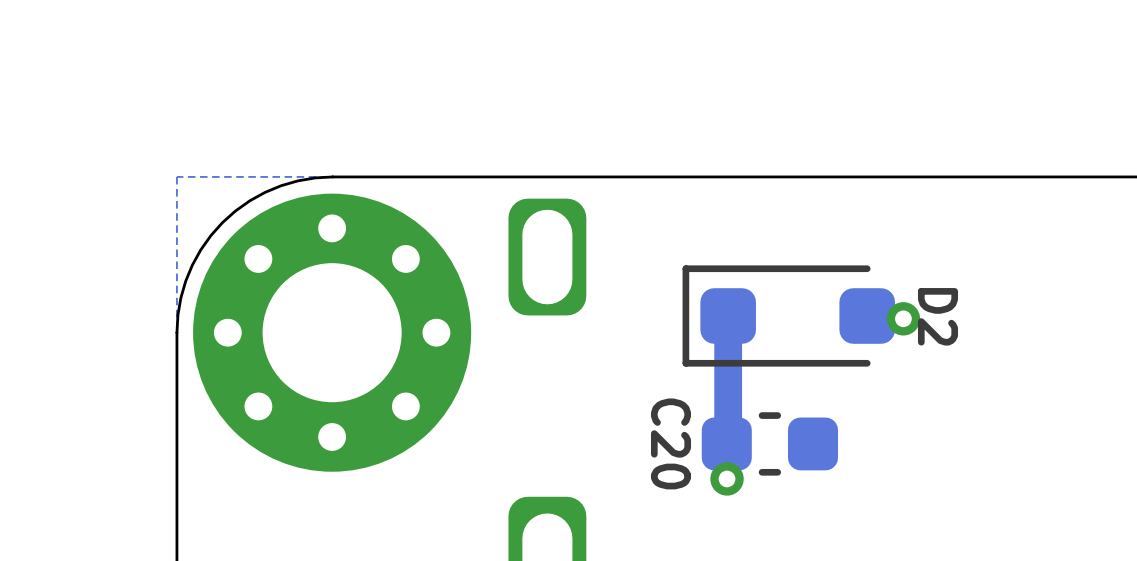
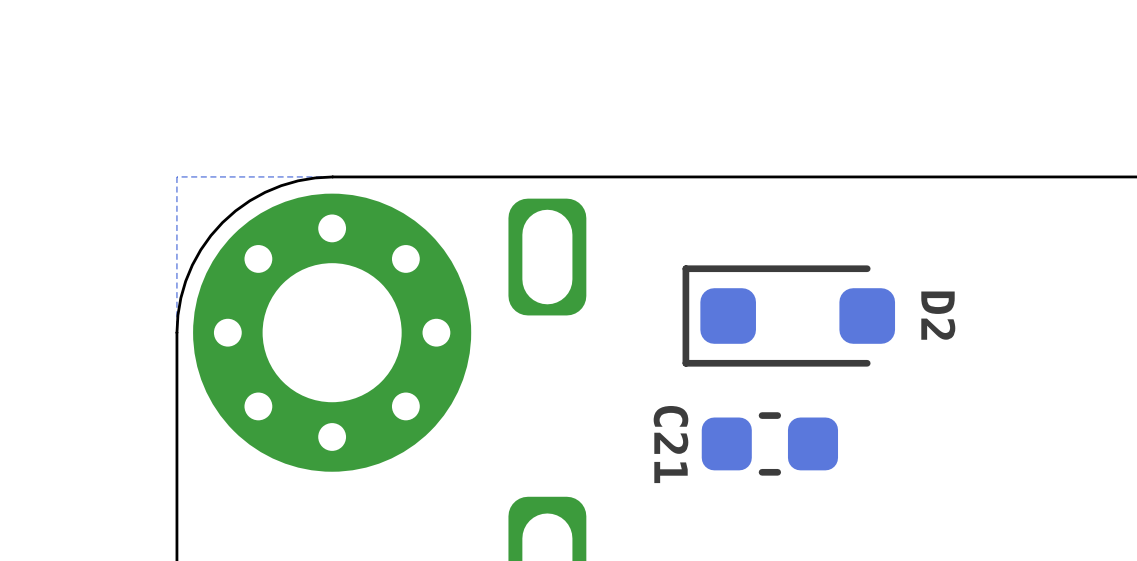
track: (728, 316) (728, 442) -> none
via: (903, 318) -> none
C20 name: C20 (671, 443) -> C21 (670, 444)
via: (727, 478) -> none

